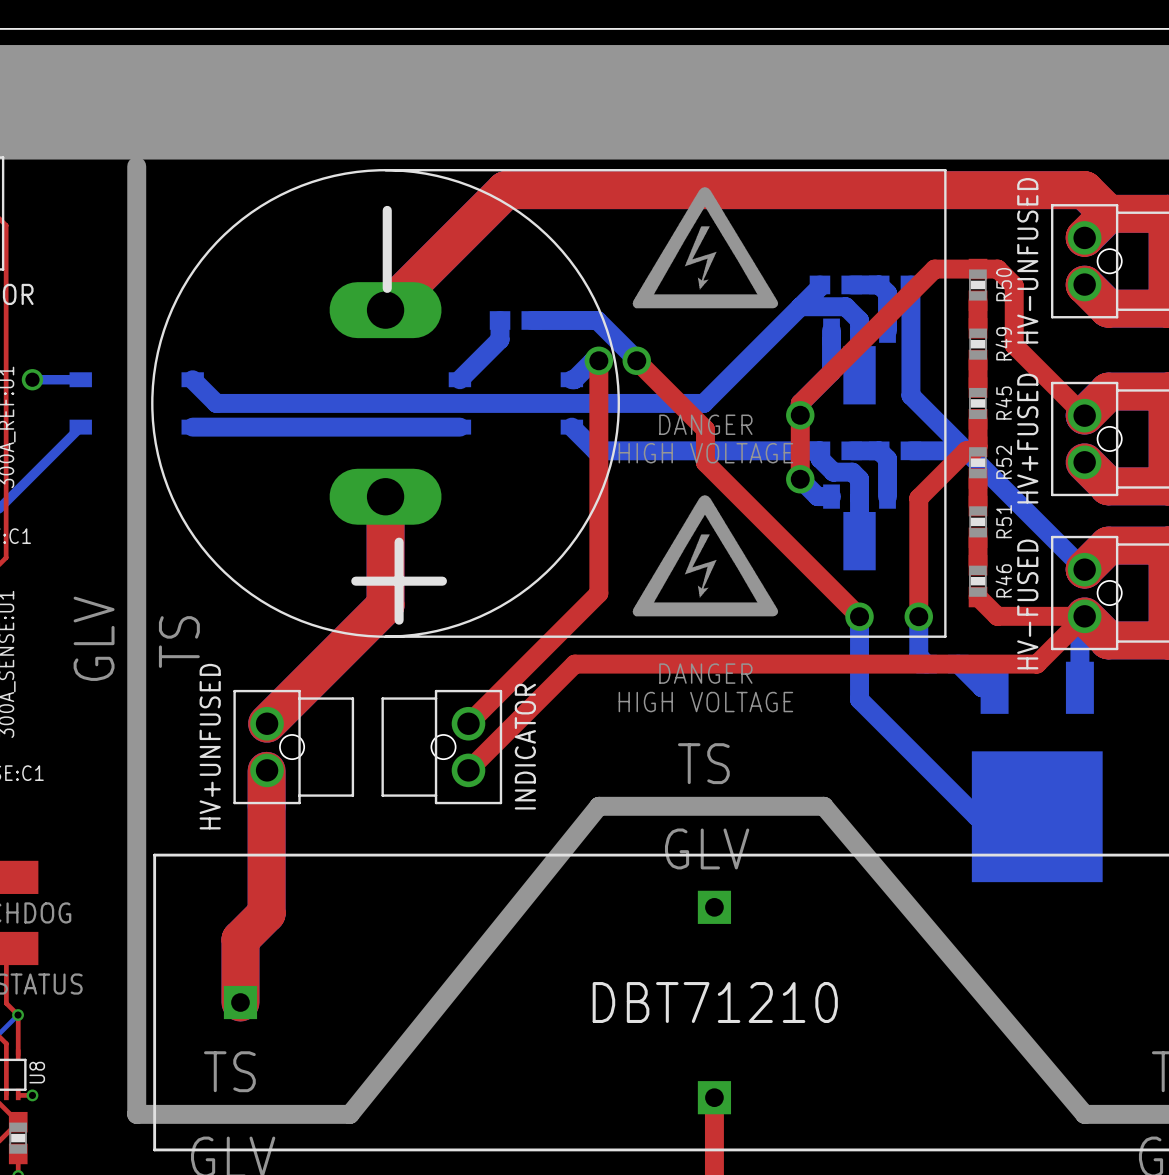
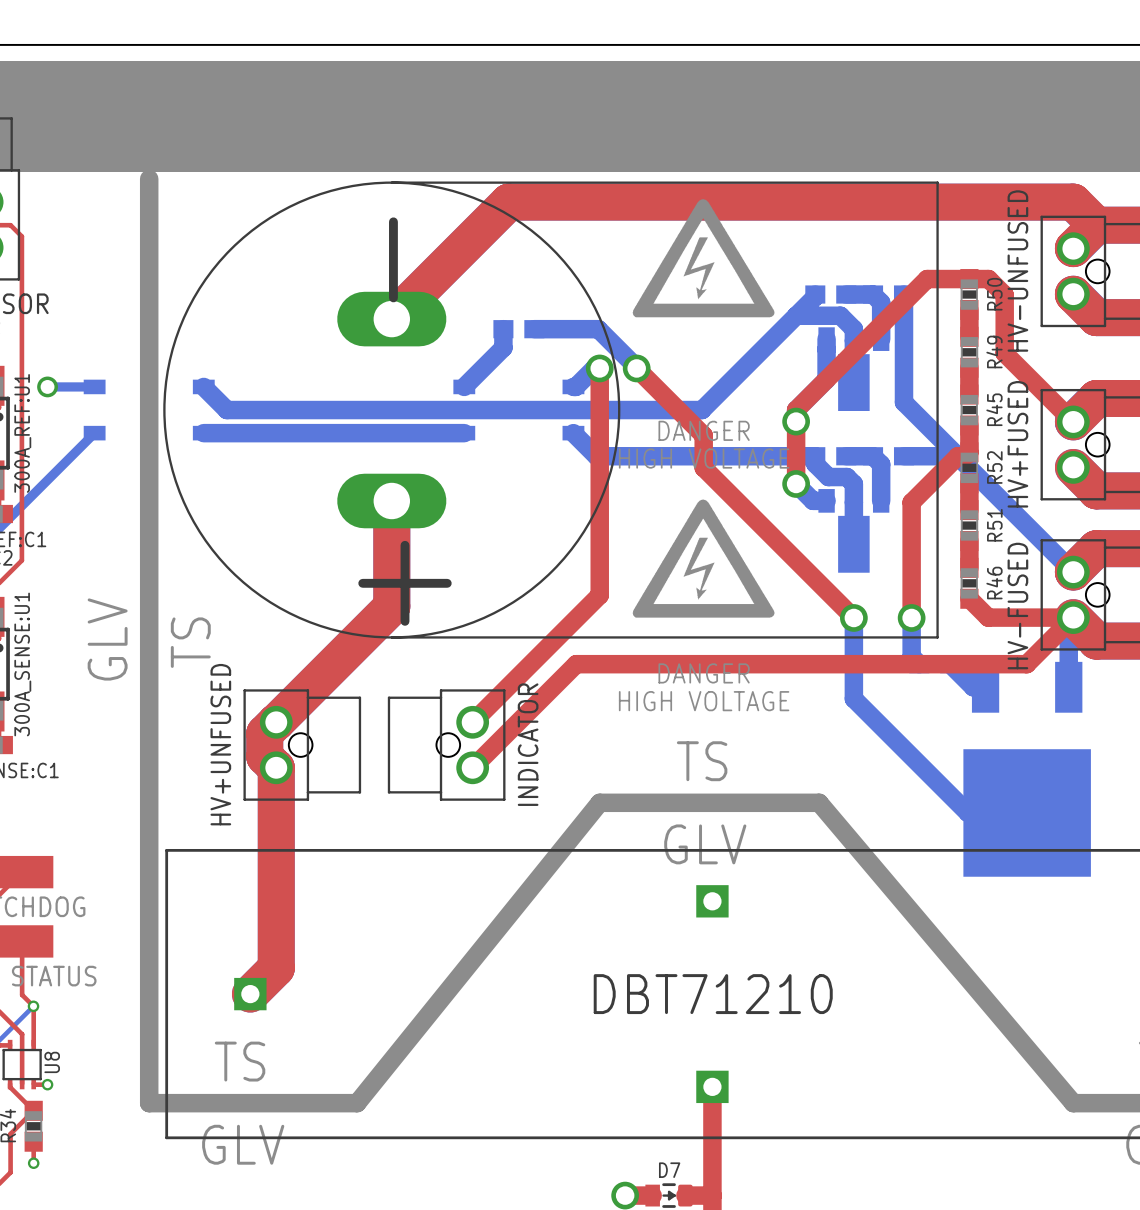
top track: (266, 770) (266, 913) (240, 939) (240, 1002) -> (276, 722) (264, 733) (264, 756) (276, 767) (276, 968) (250, 994)

